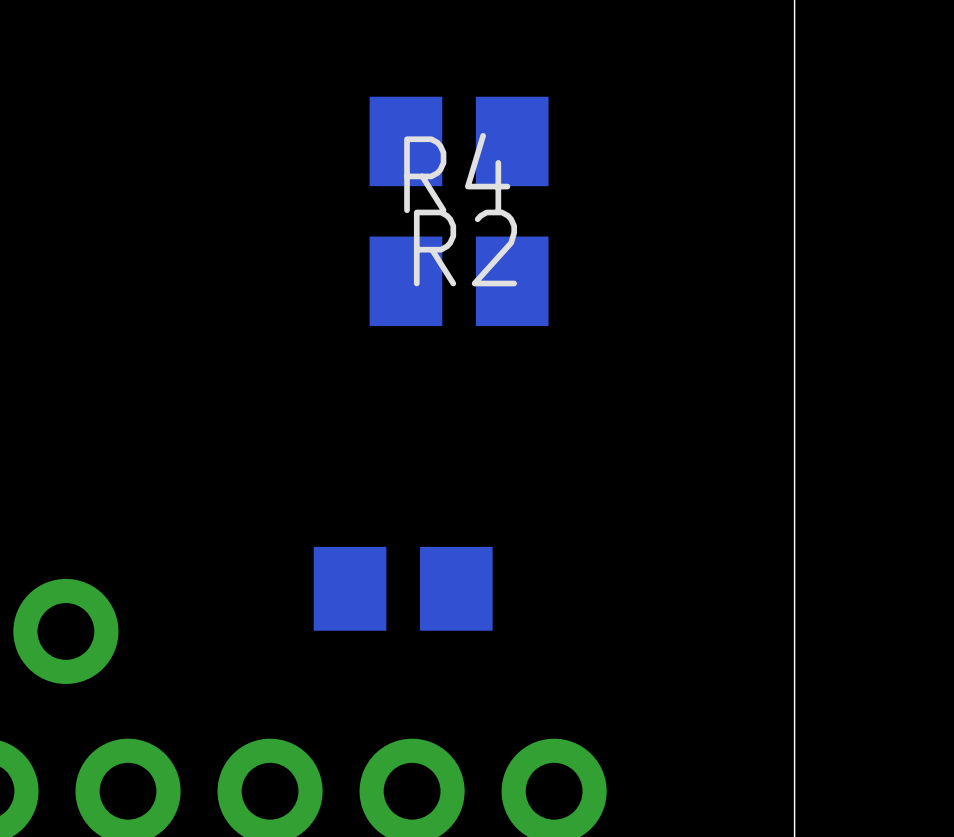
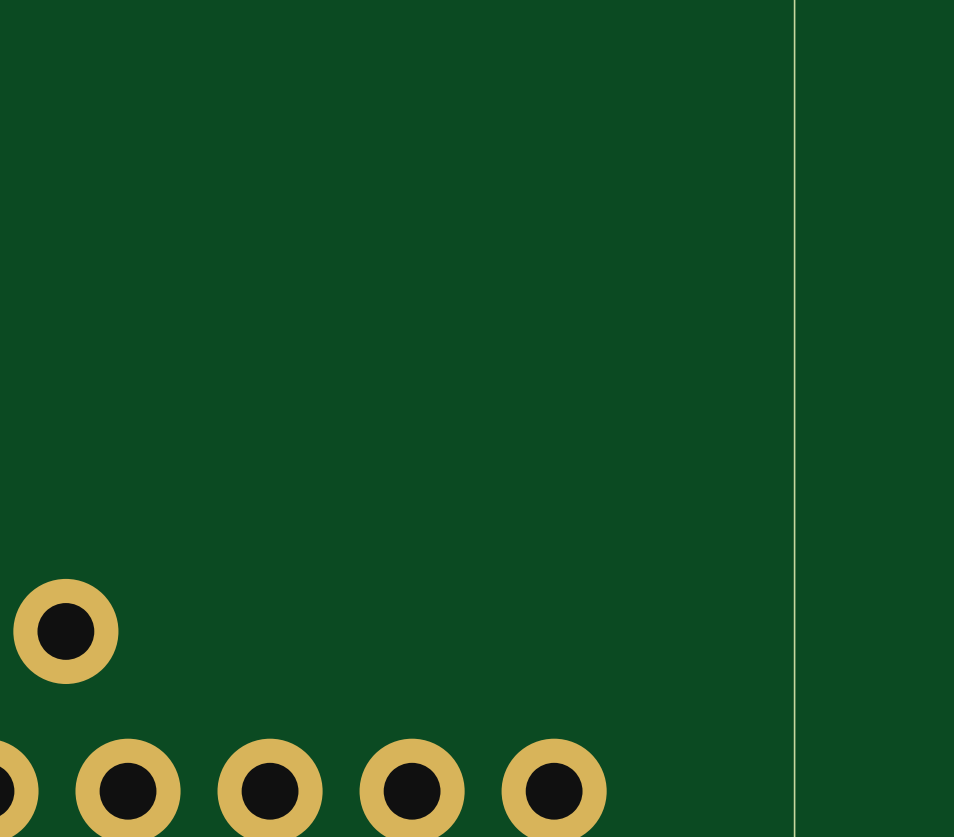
R2: (459, 141) -> none
R4: (459, 281) -> none
part: (403, 588) -> none

